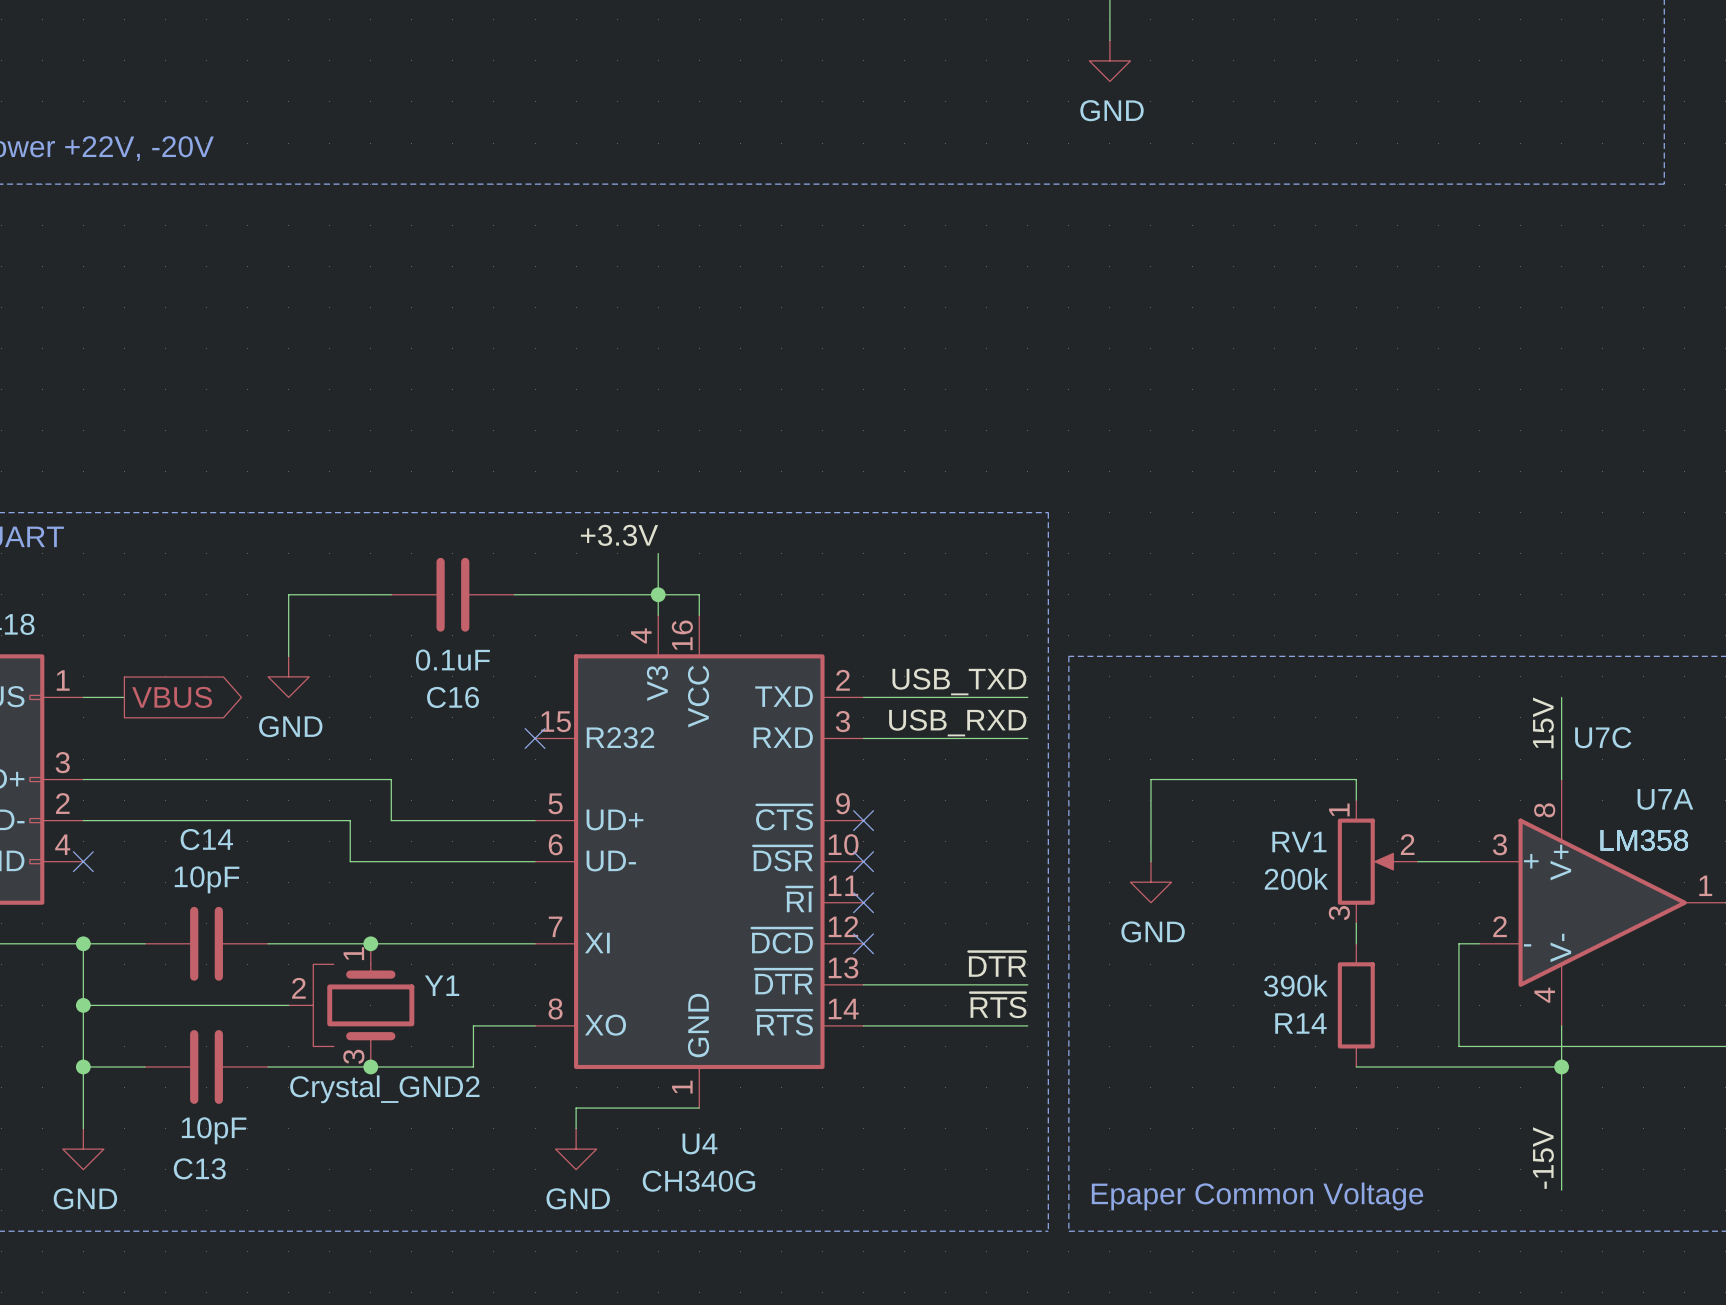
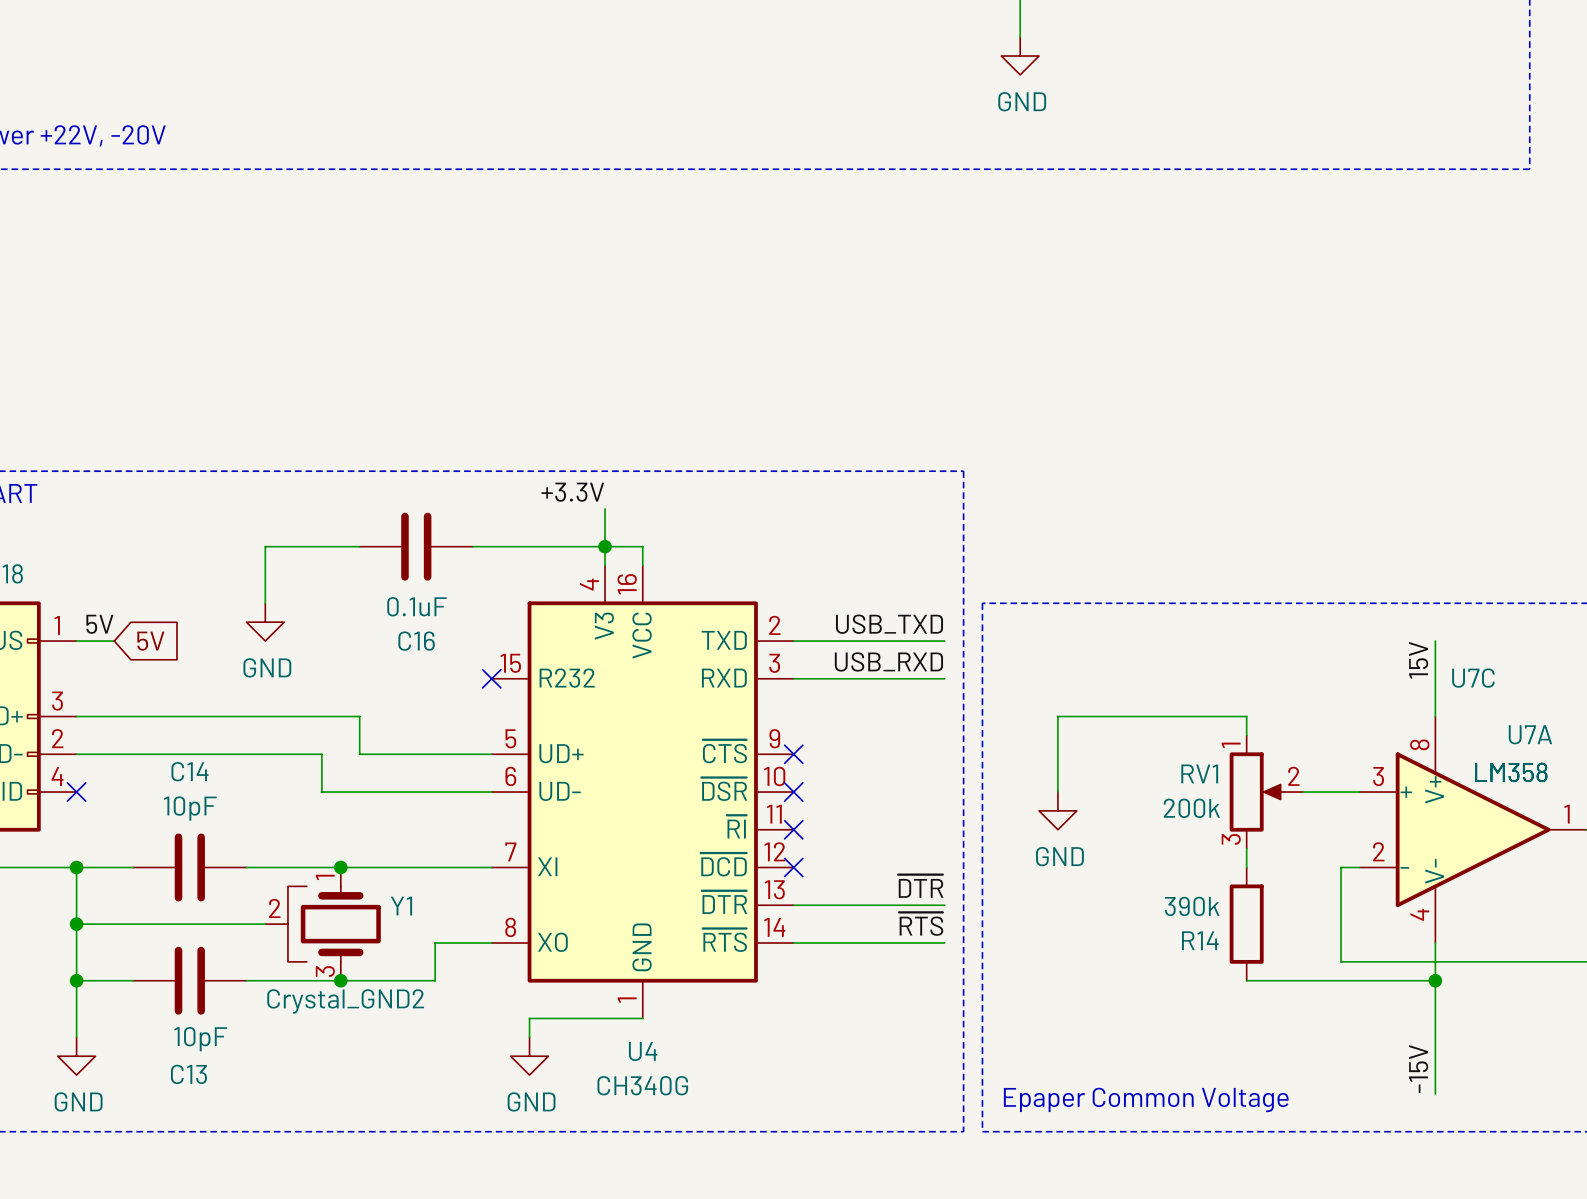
label: none -> 5V (99, 624)
global label shape: output (172, 697) -> input (150, 641)
global label: VBUS (172, 697) -> 5V (150, 641)

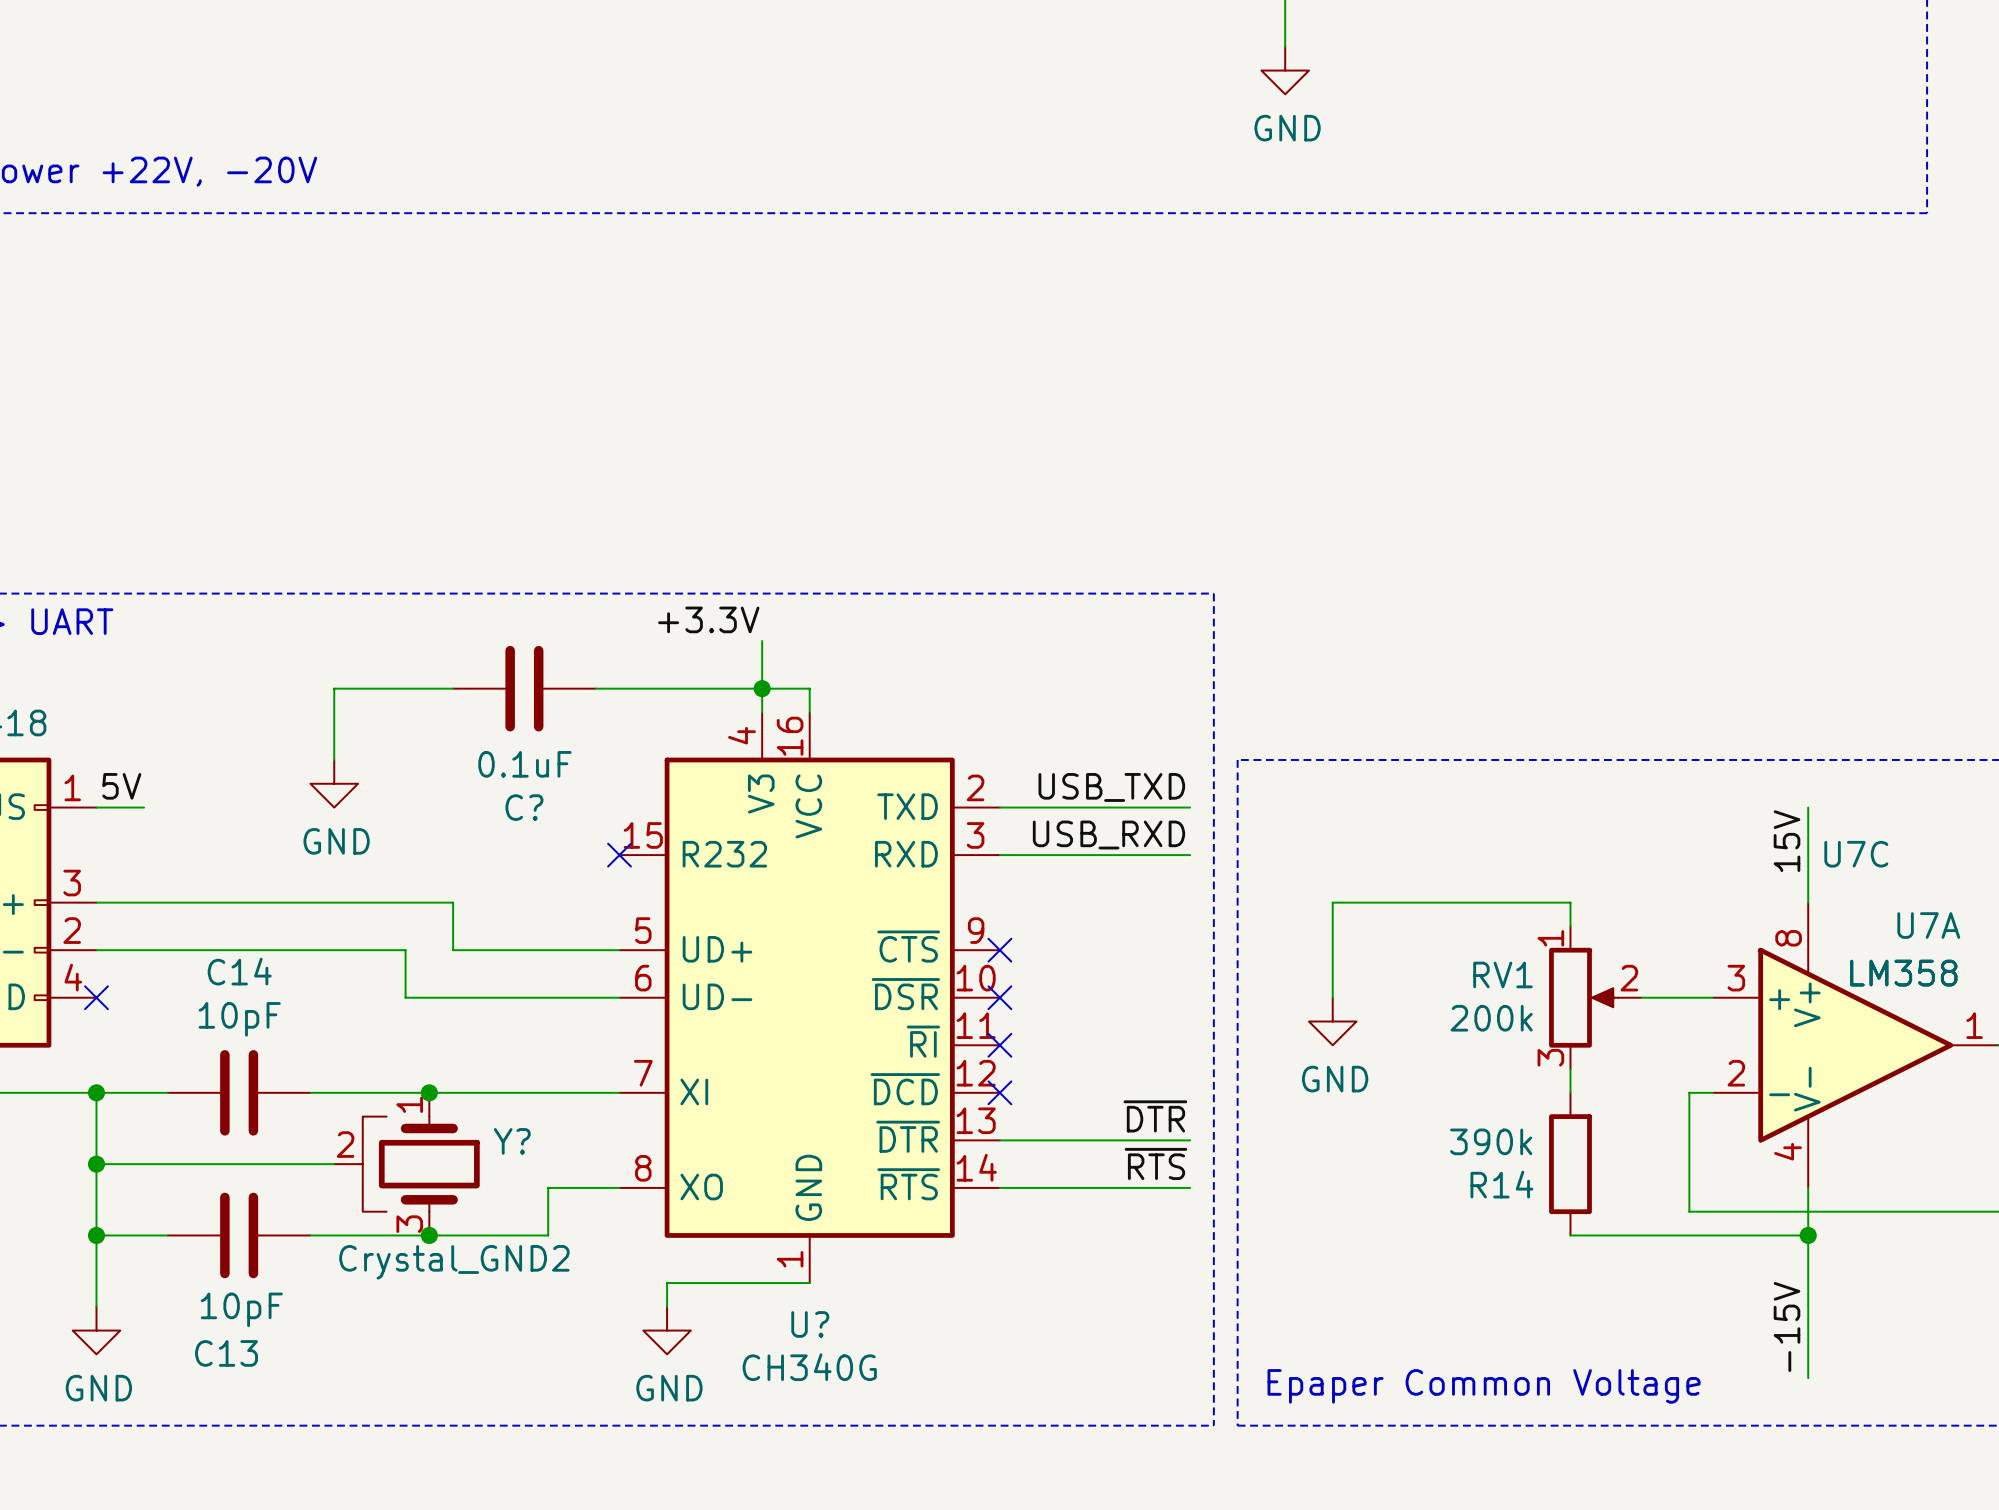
global label: 5V (150, 641) -> none
C16 name: C16 (416, 641) -> C? (524, 807)
Y1 name: Y1 (401, 906) -> Y? (512, 1141)
U4 name: U4 (643, 1051) -> U? (810, 1324)

